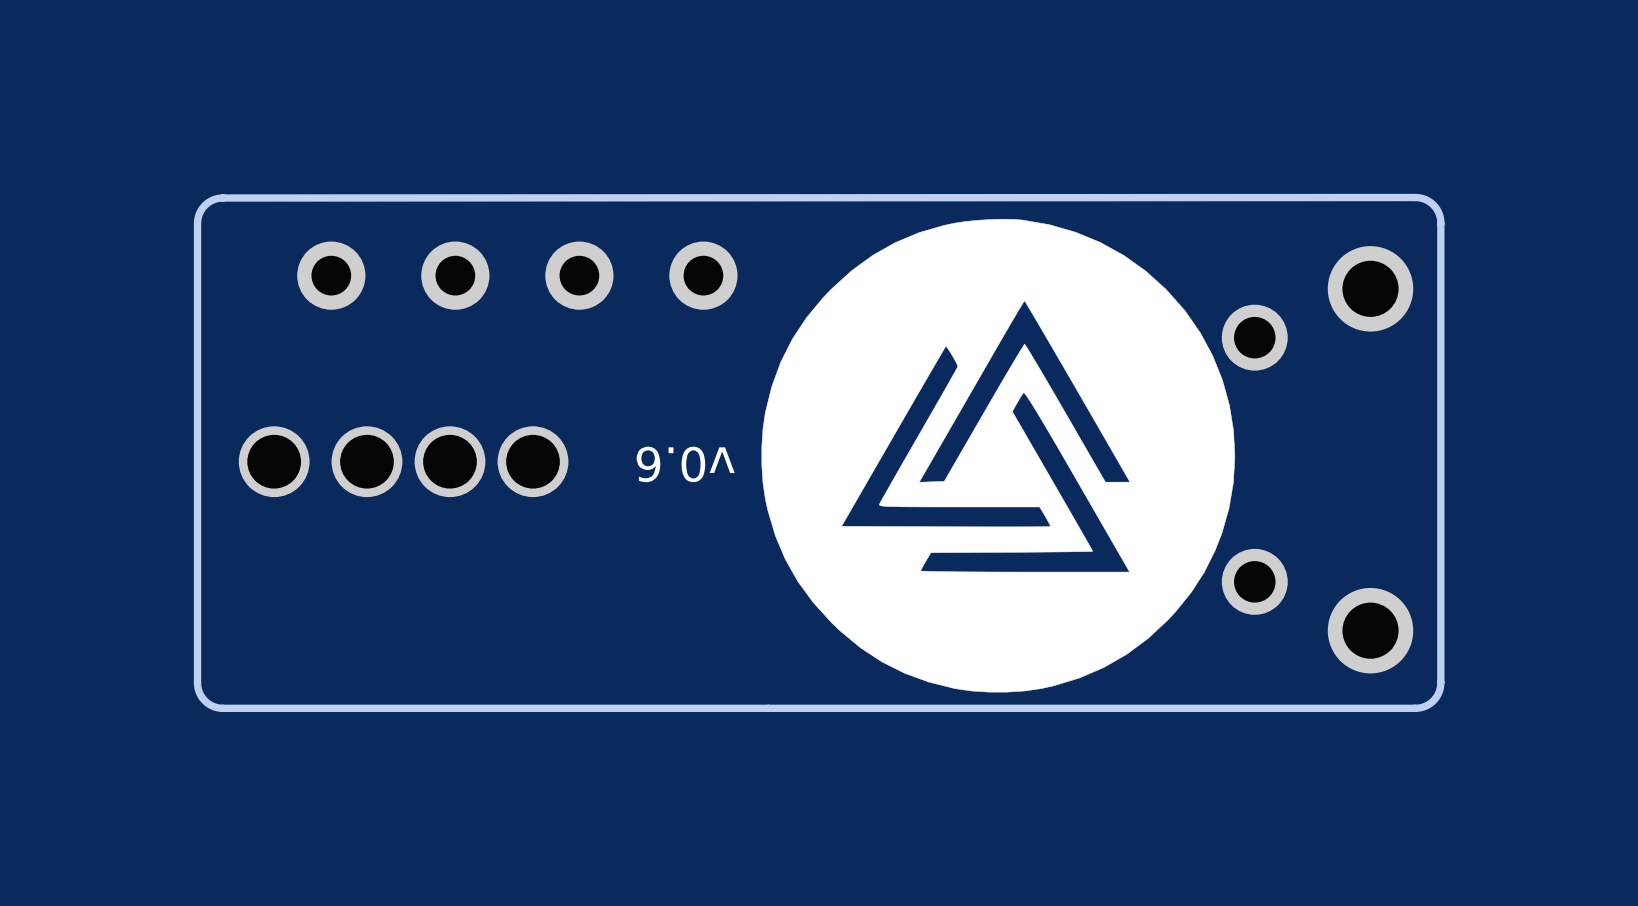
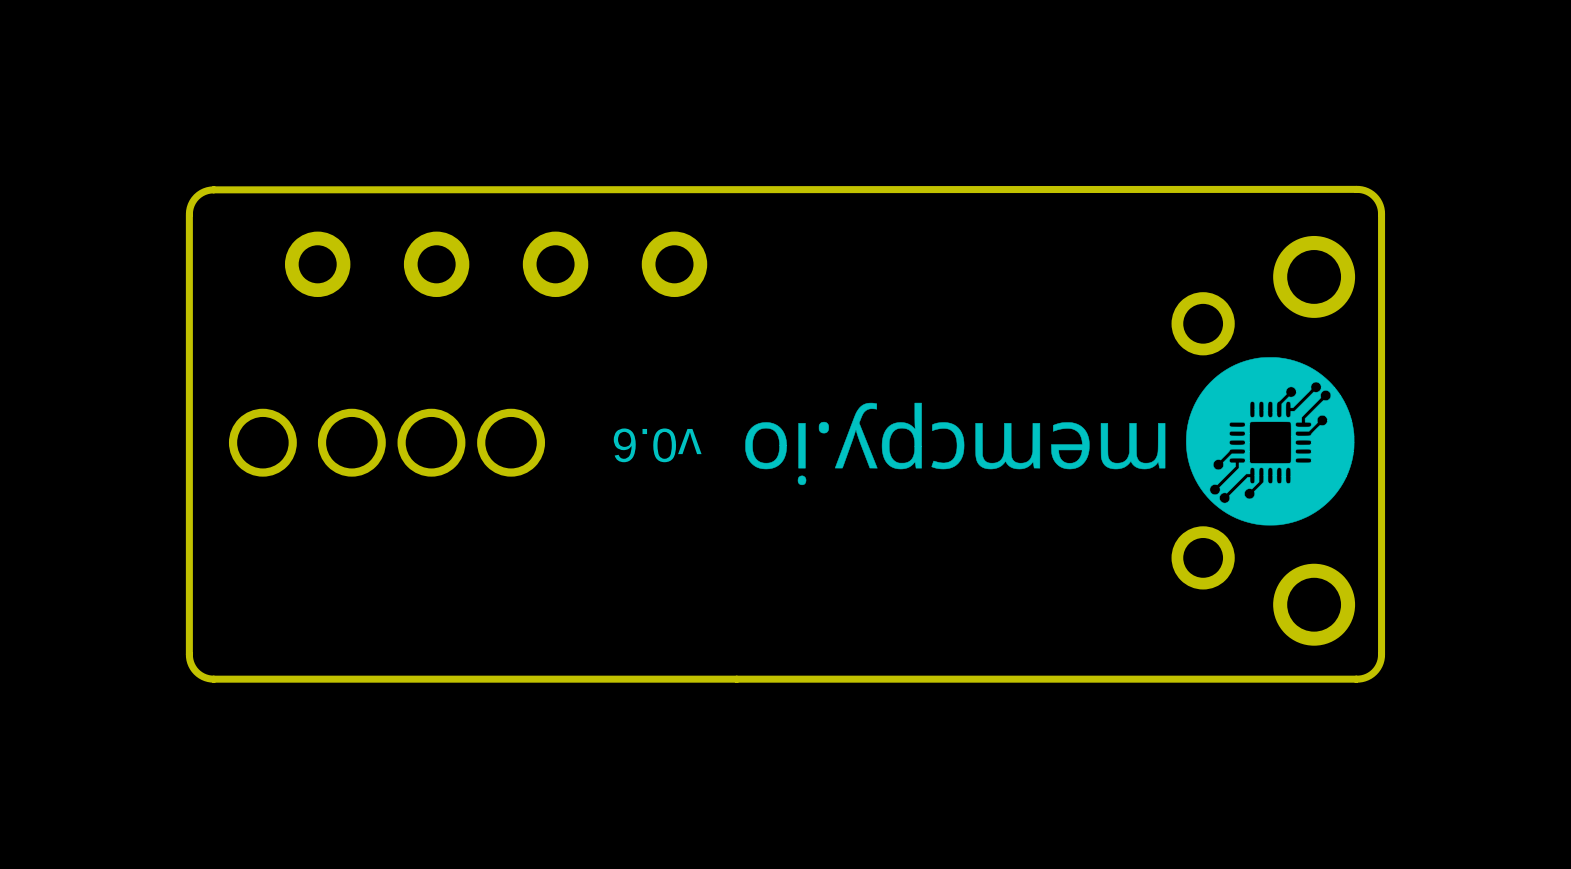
drawing: [761, 218, 1236, 693] -> none
drawing: none -> [745, 357, 1355, 526]

